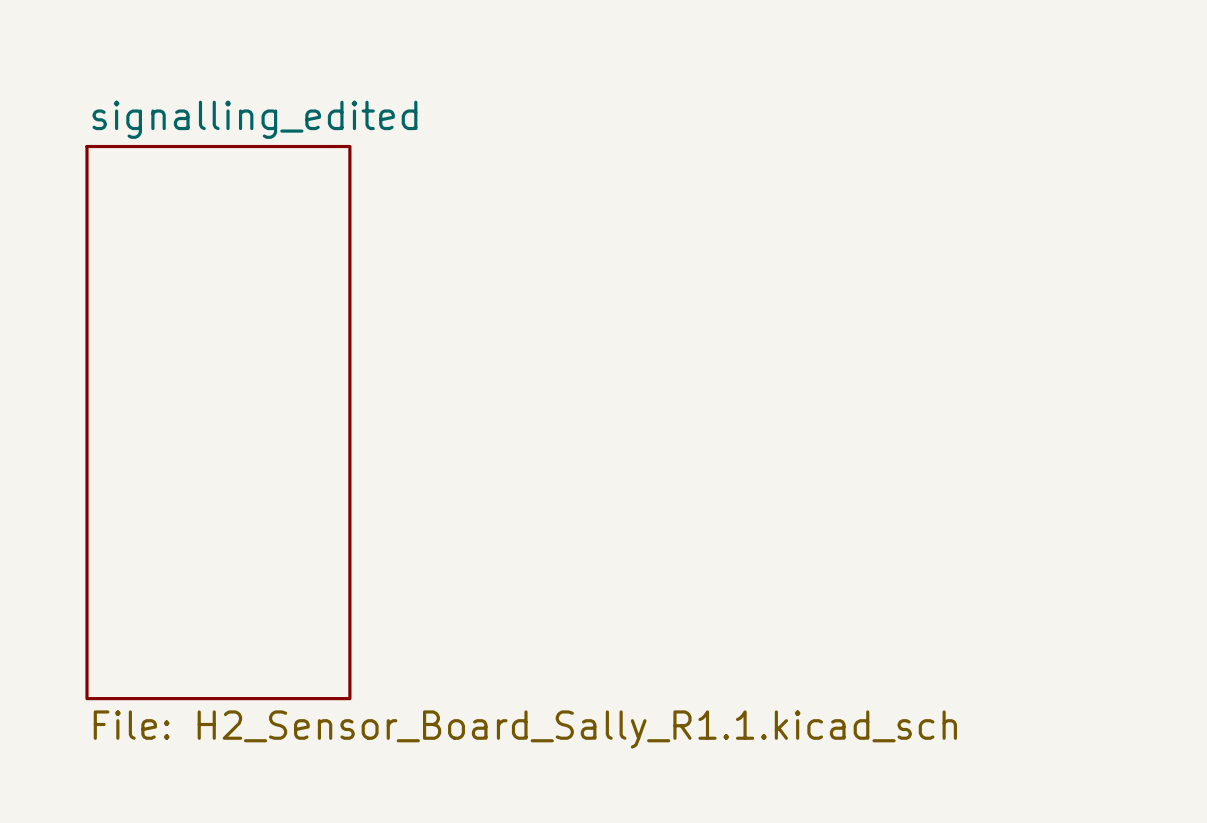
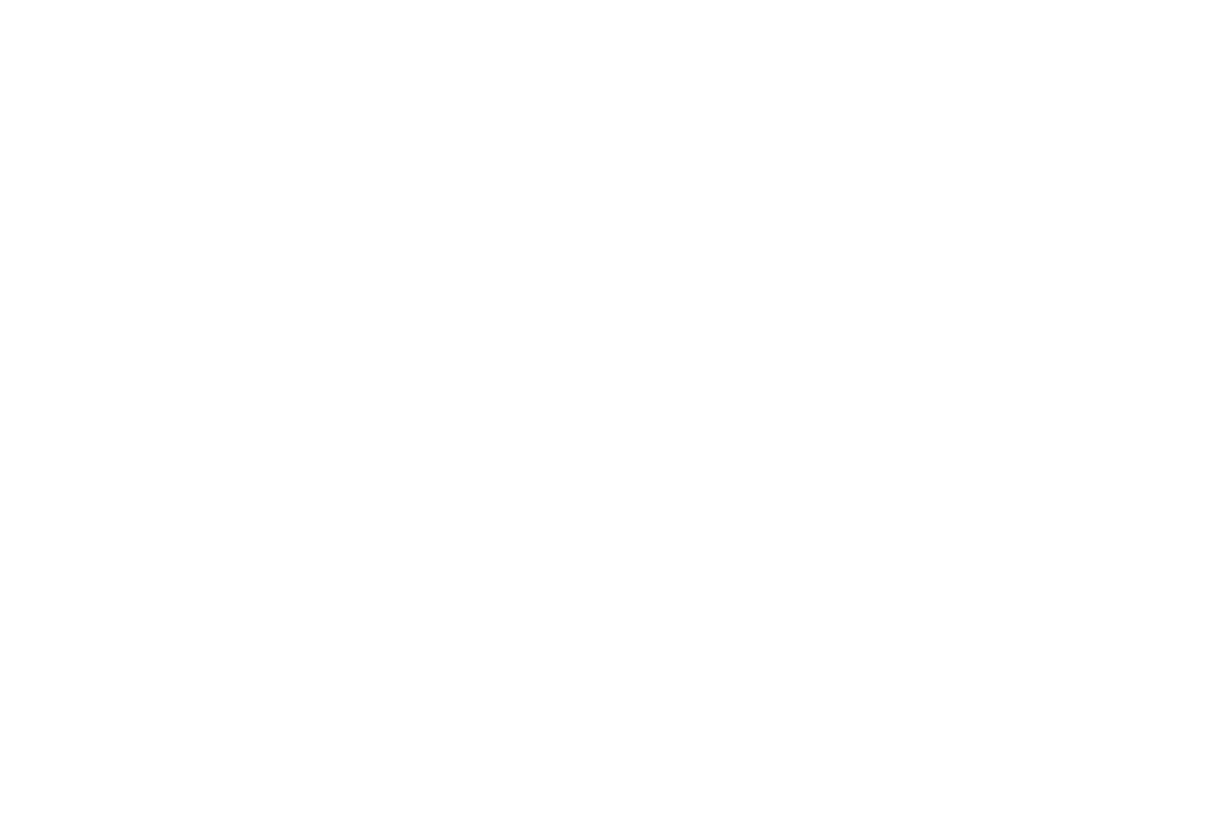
sheet signalling_edited: File: H2_Sensor_Board_Sally_R1.1.kicad_sch (218, 422) -> none

